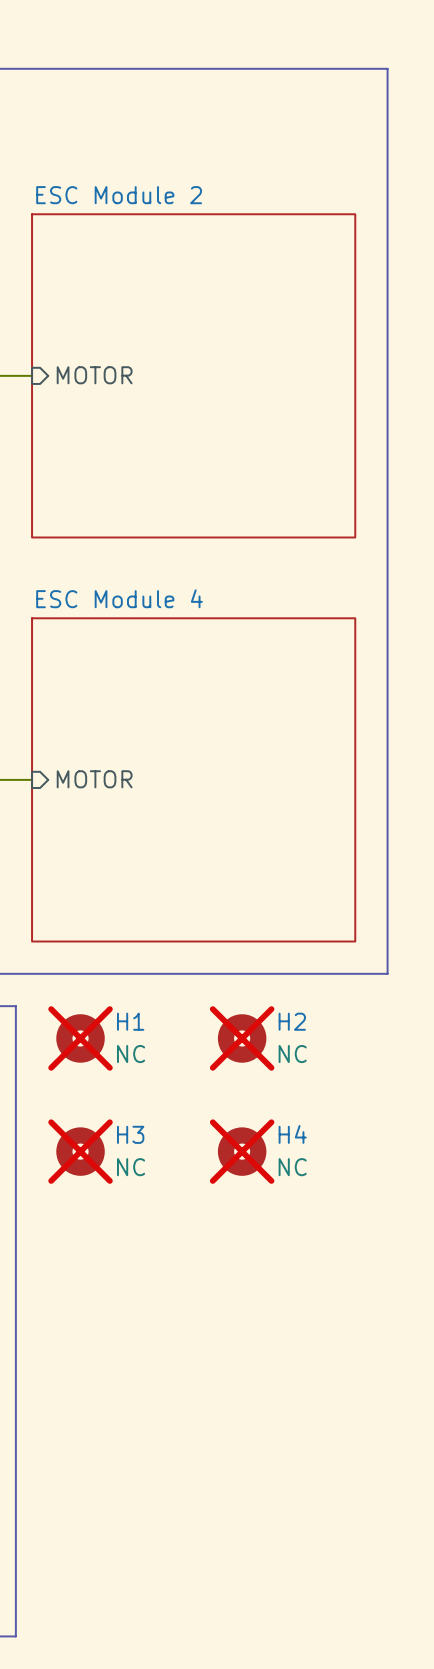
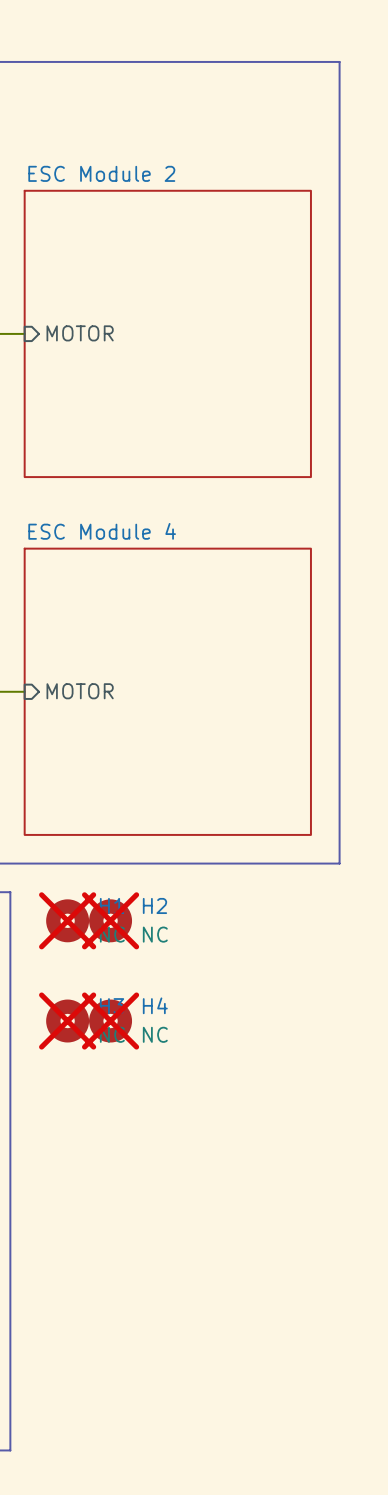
H2 position: (242, 1038) -> (110, 920)
H4 position: (242, 1151) -> (110, 1021)

